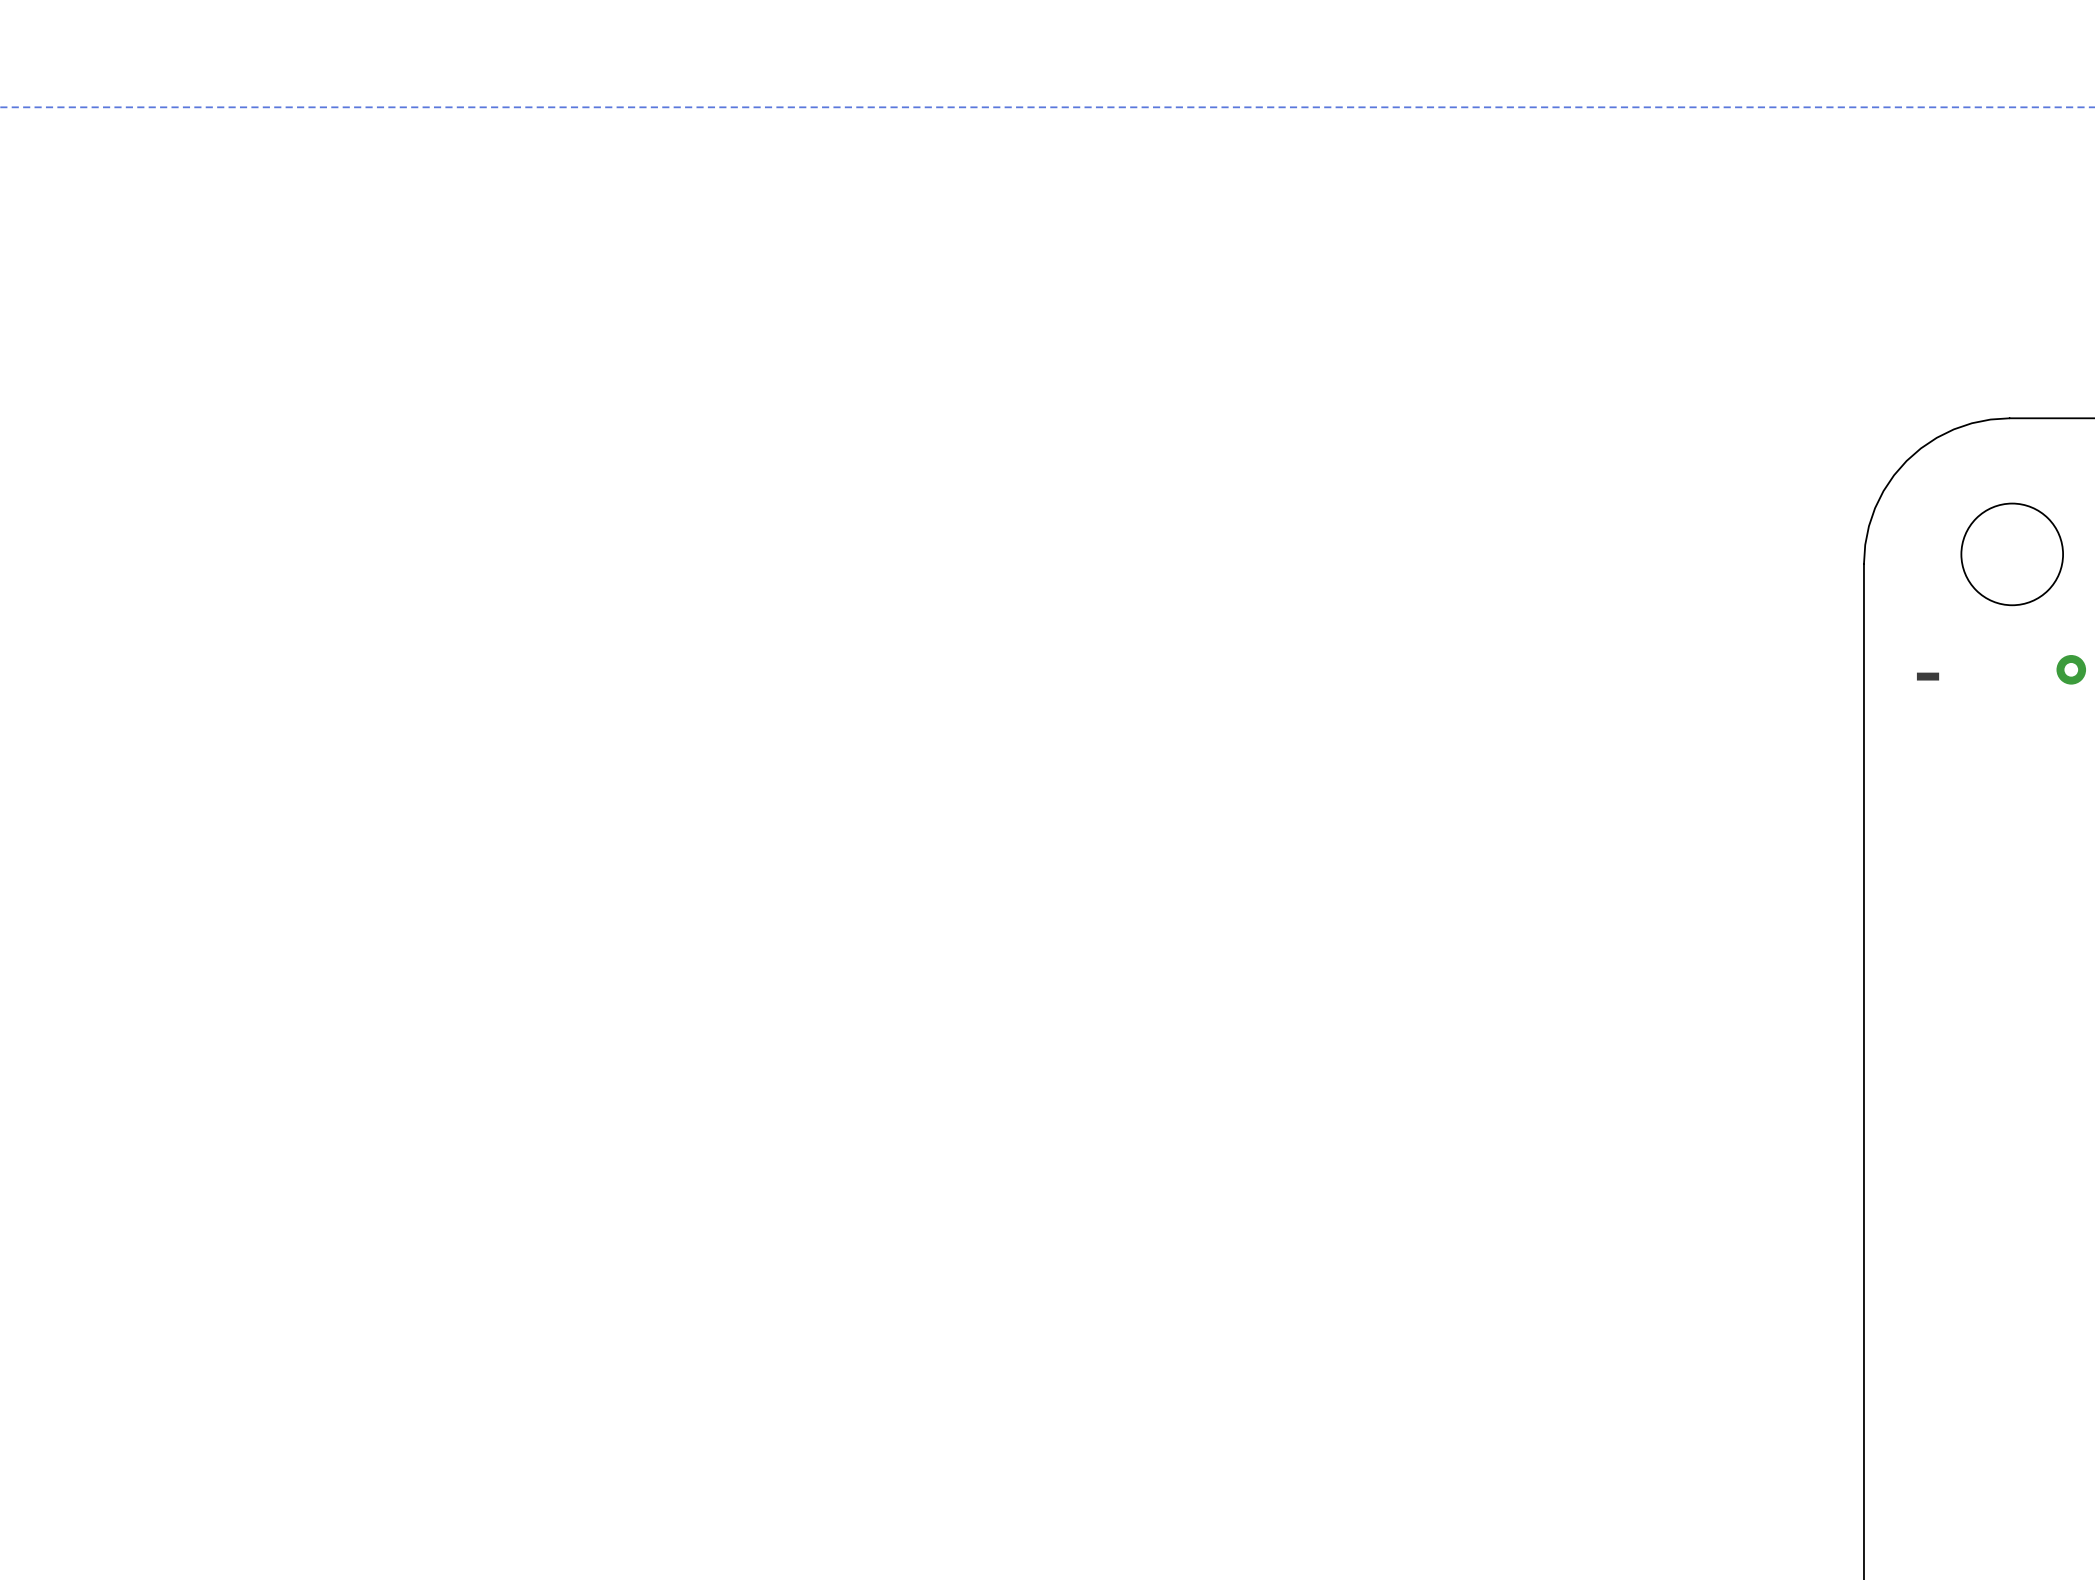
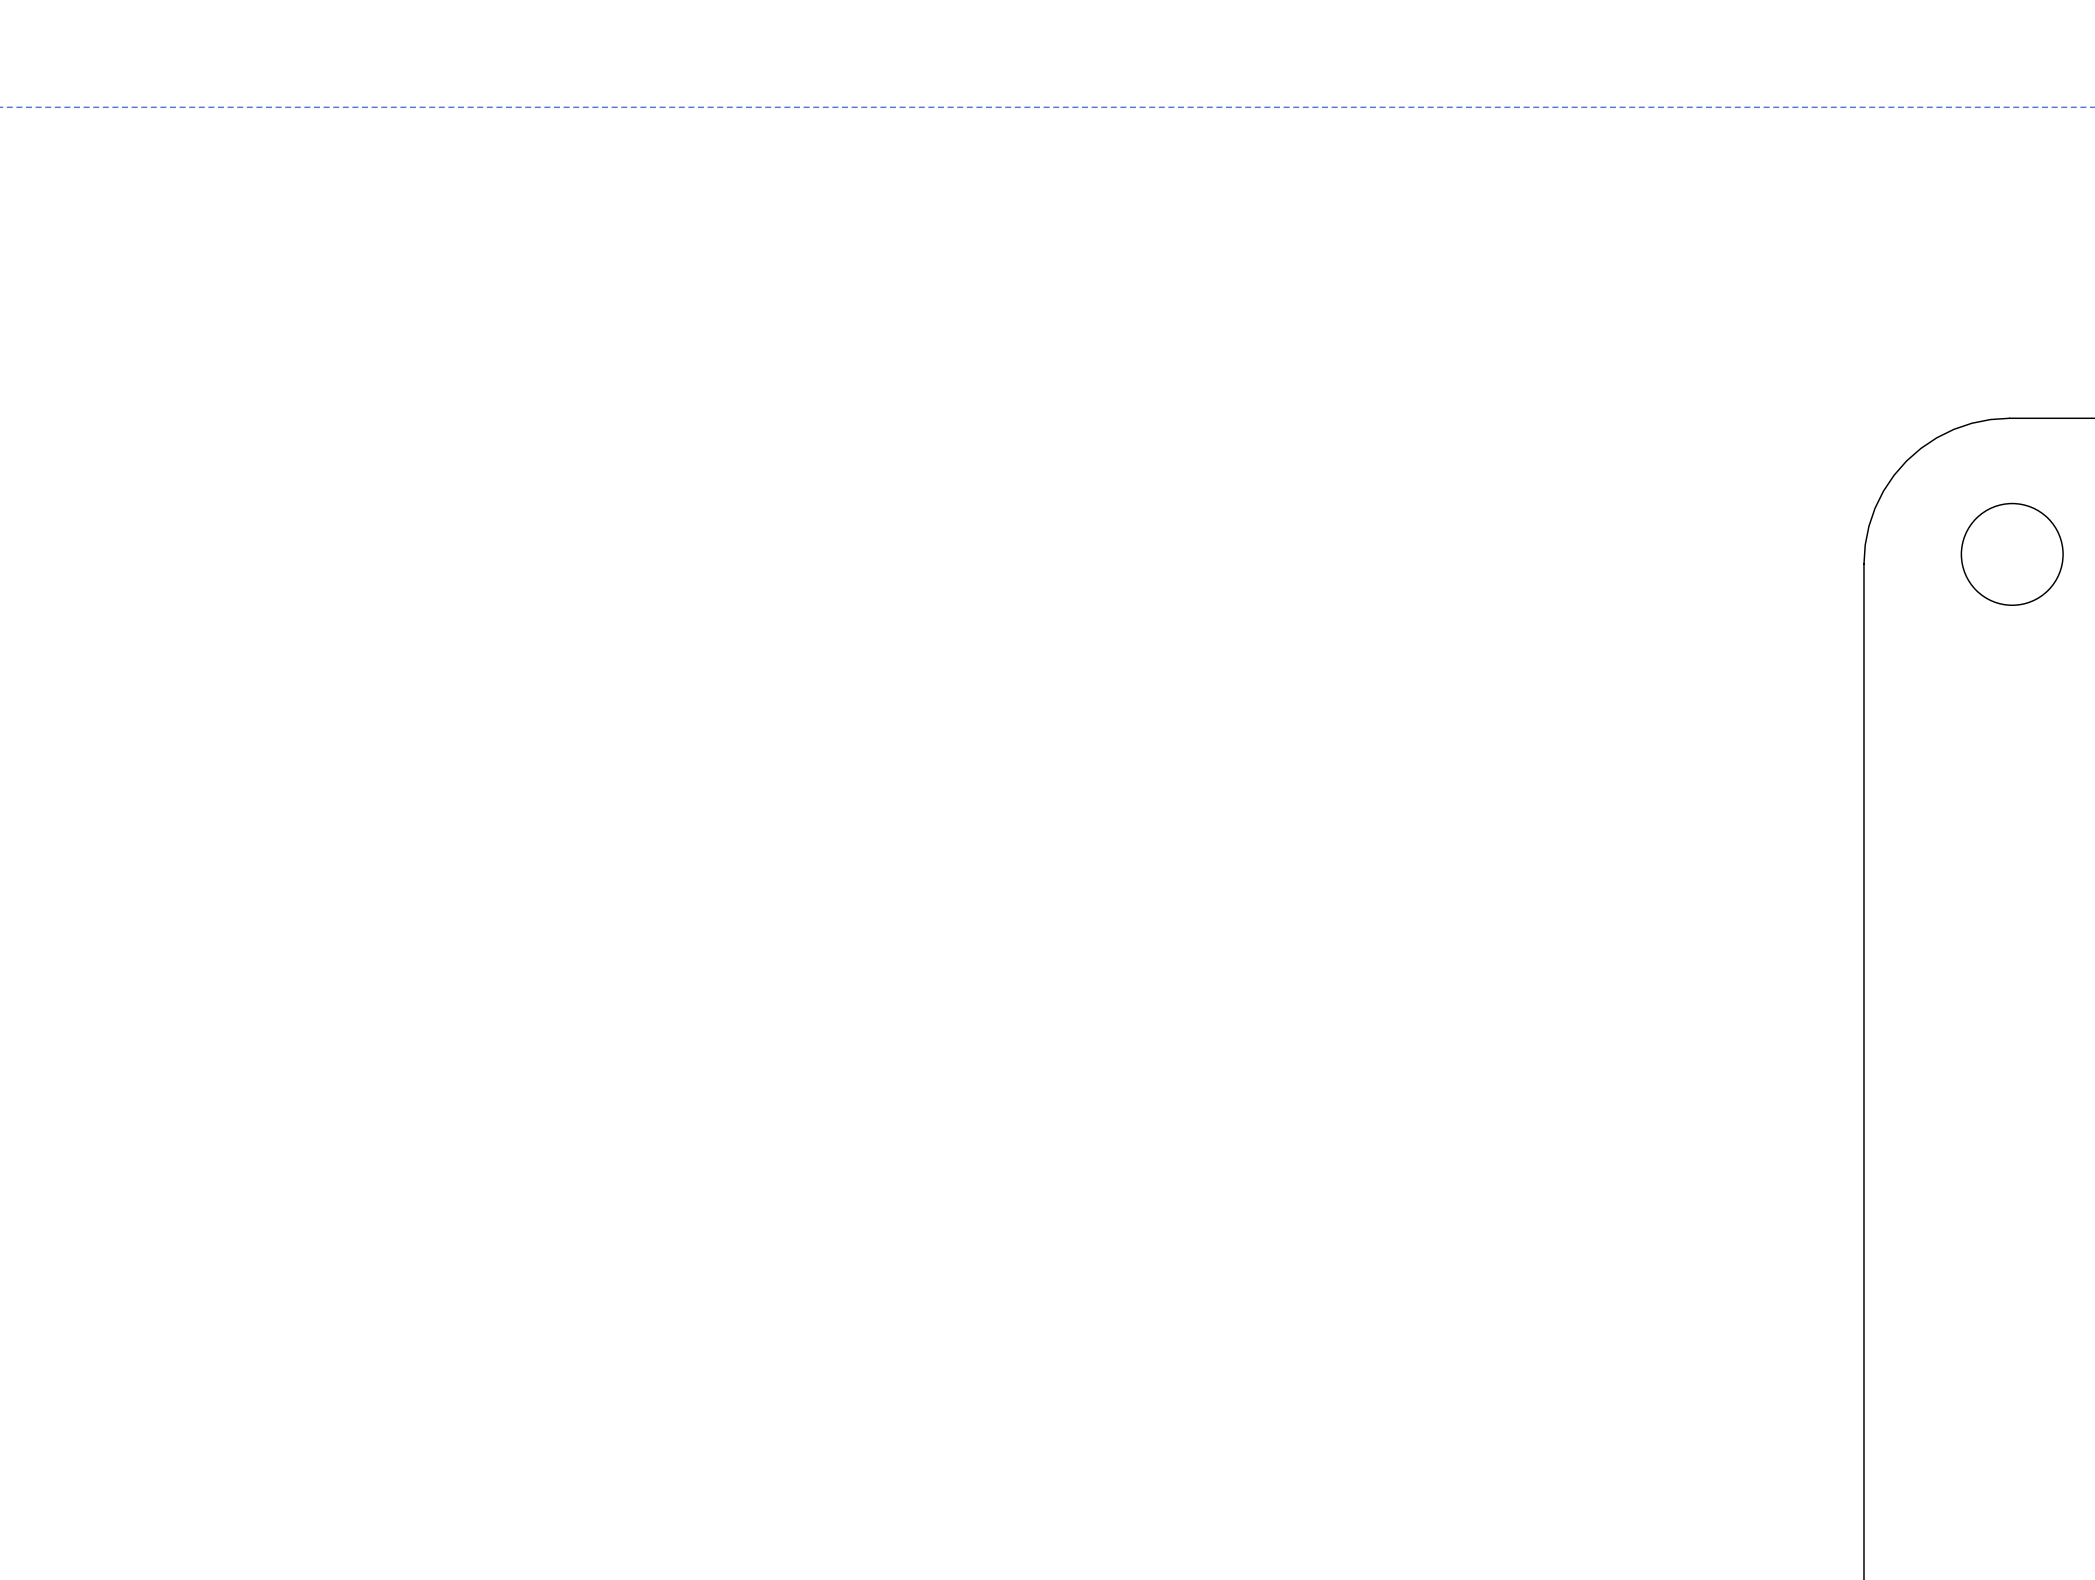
via: (2071, 669) -> none
text: - (1928, 676) -> none

